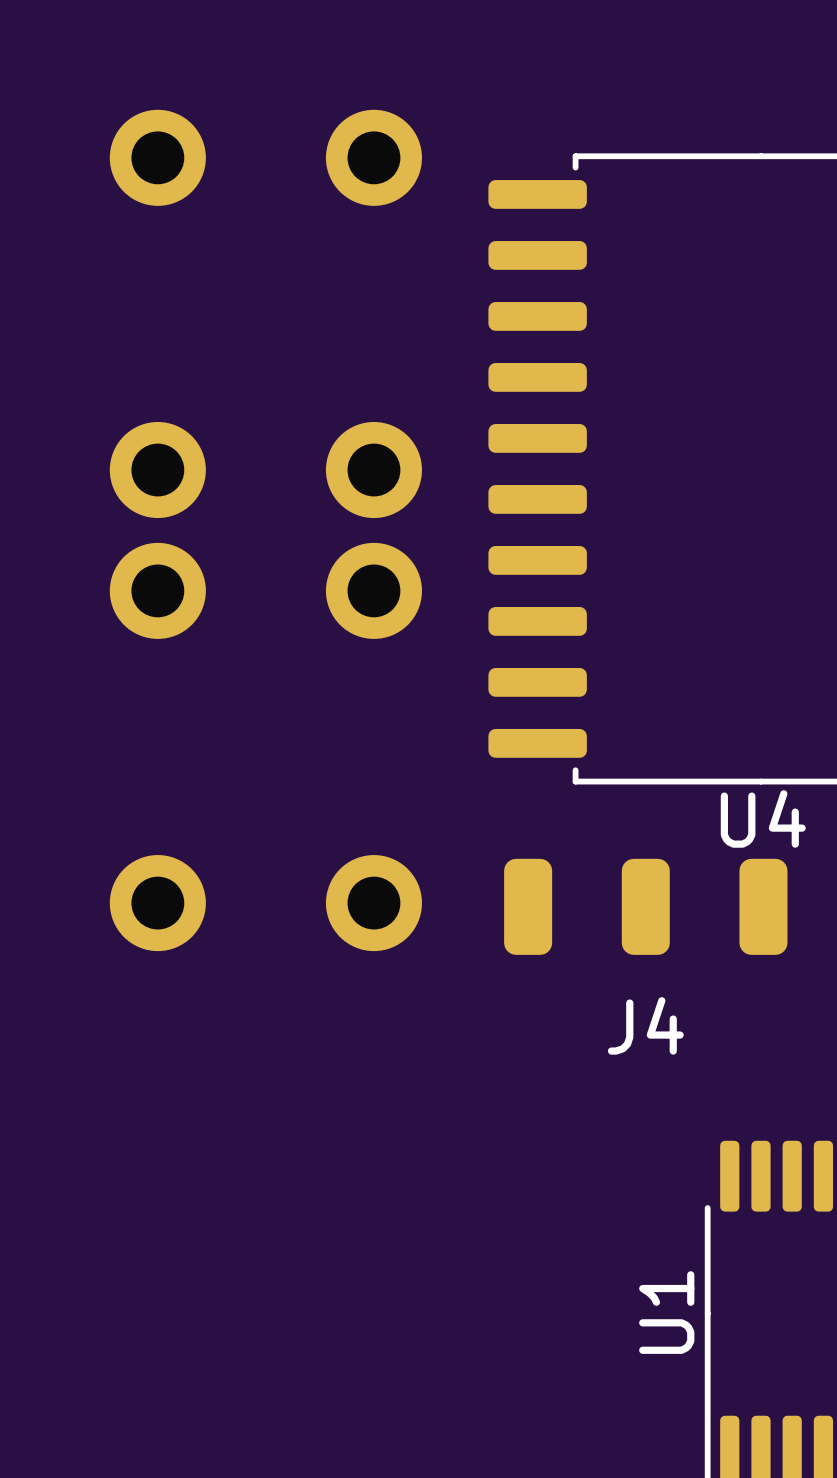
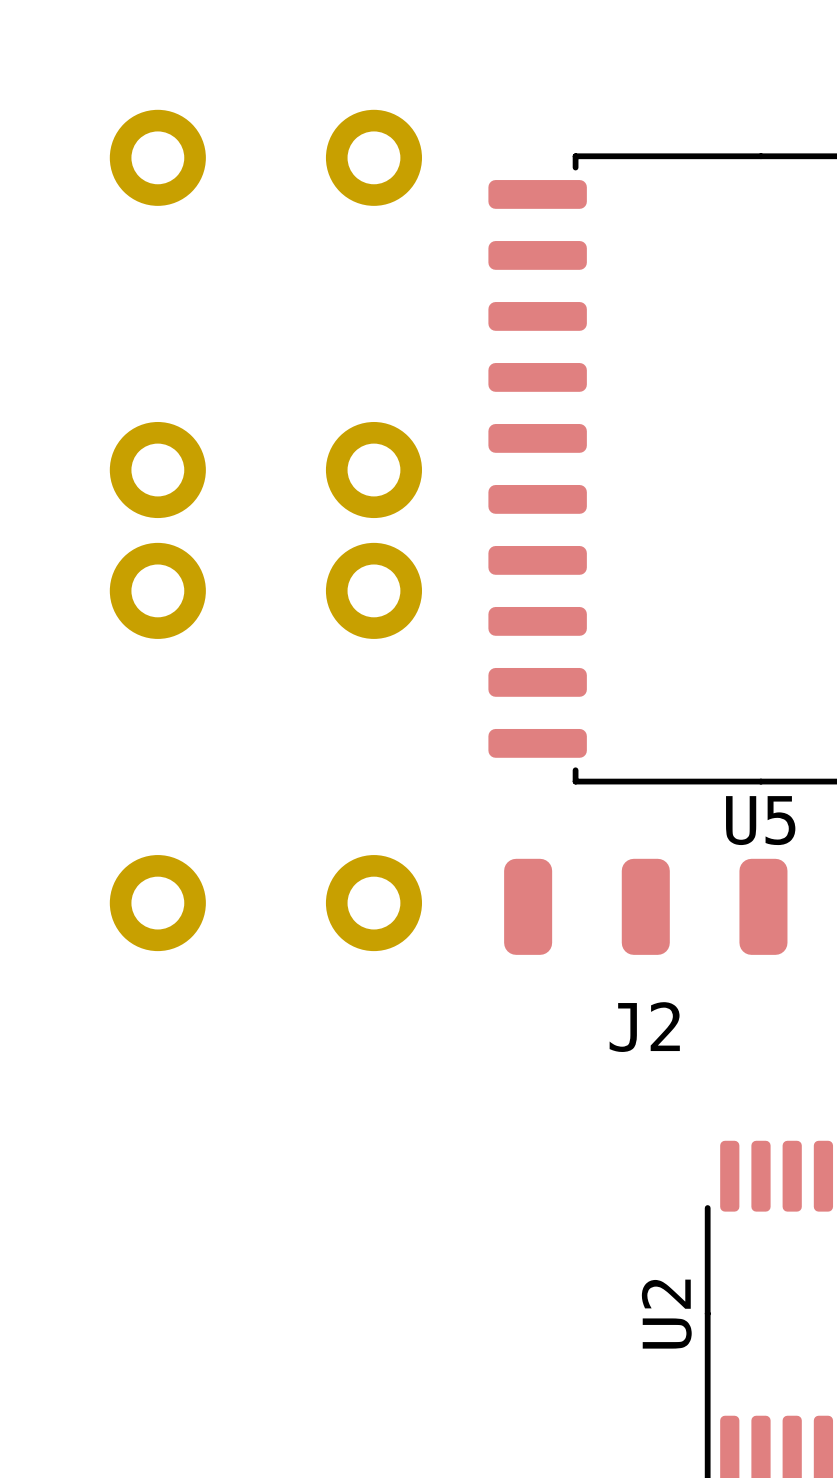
U4 name: U4 (763, 818) -> U5 (760, 820)
J4 name: J4 (645, 1025) -> J2 (644, 1027)
U1 name: U1 (666, 1312) -> U2 (666, 1314)

